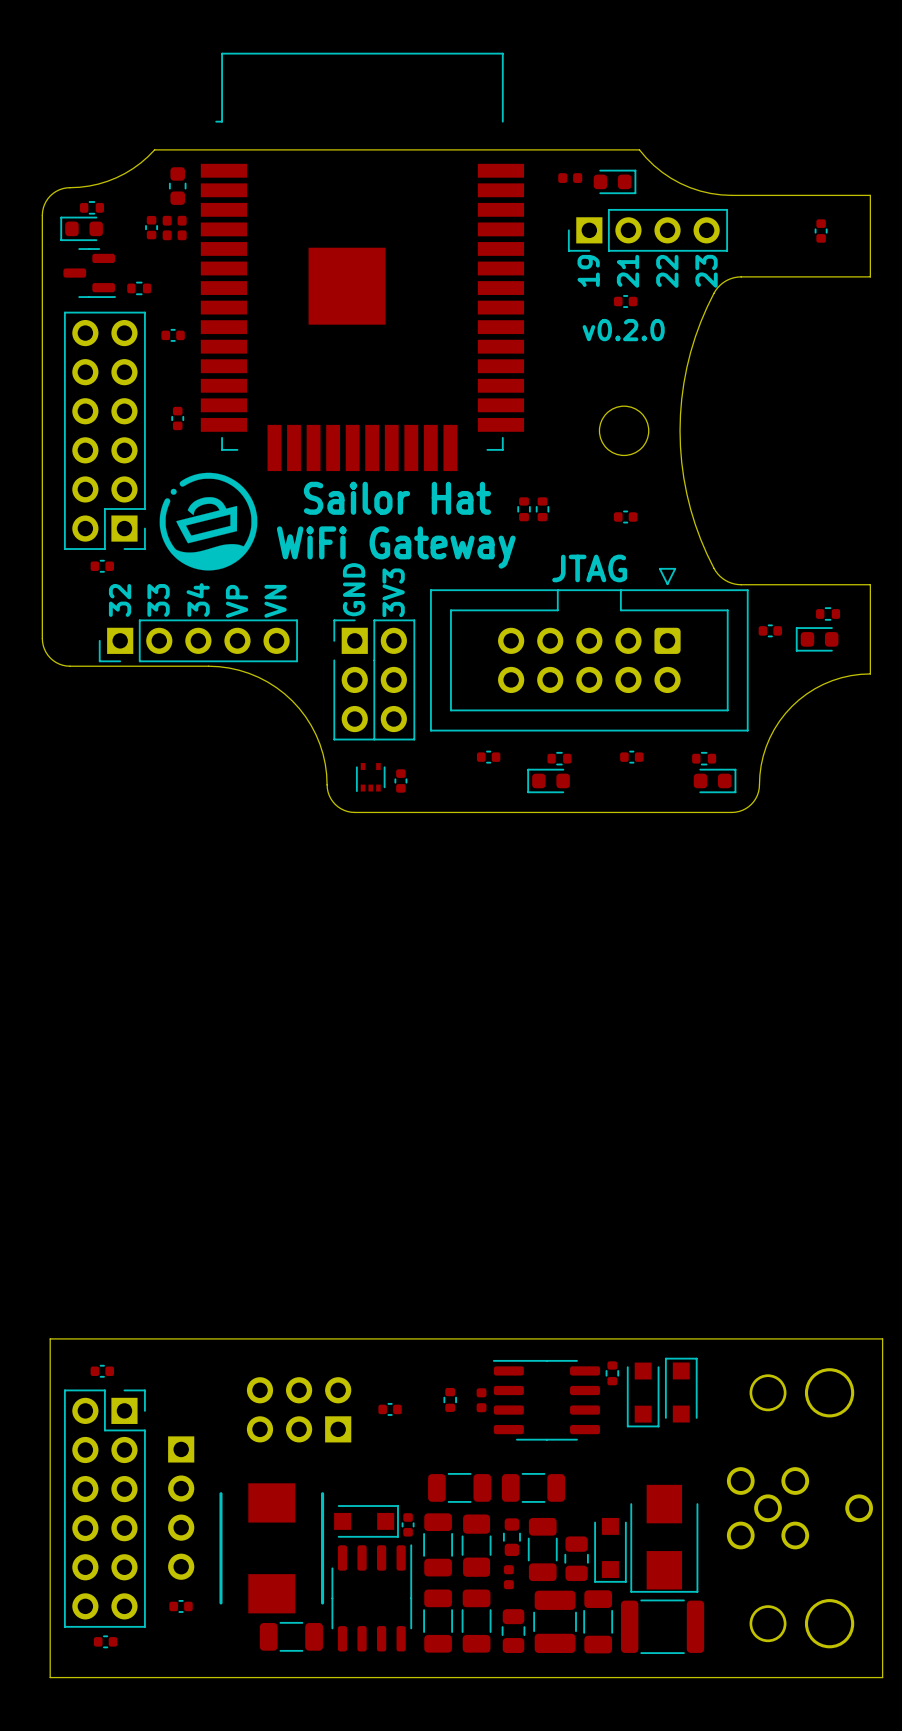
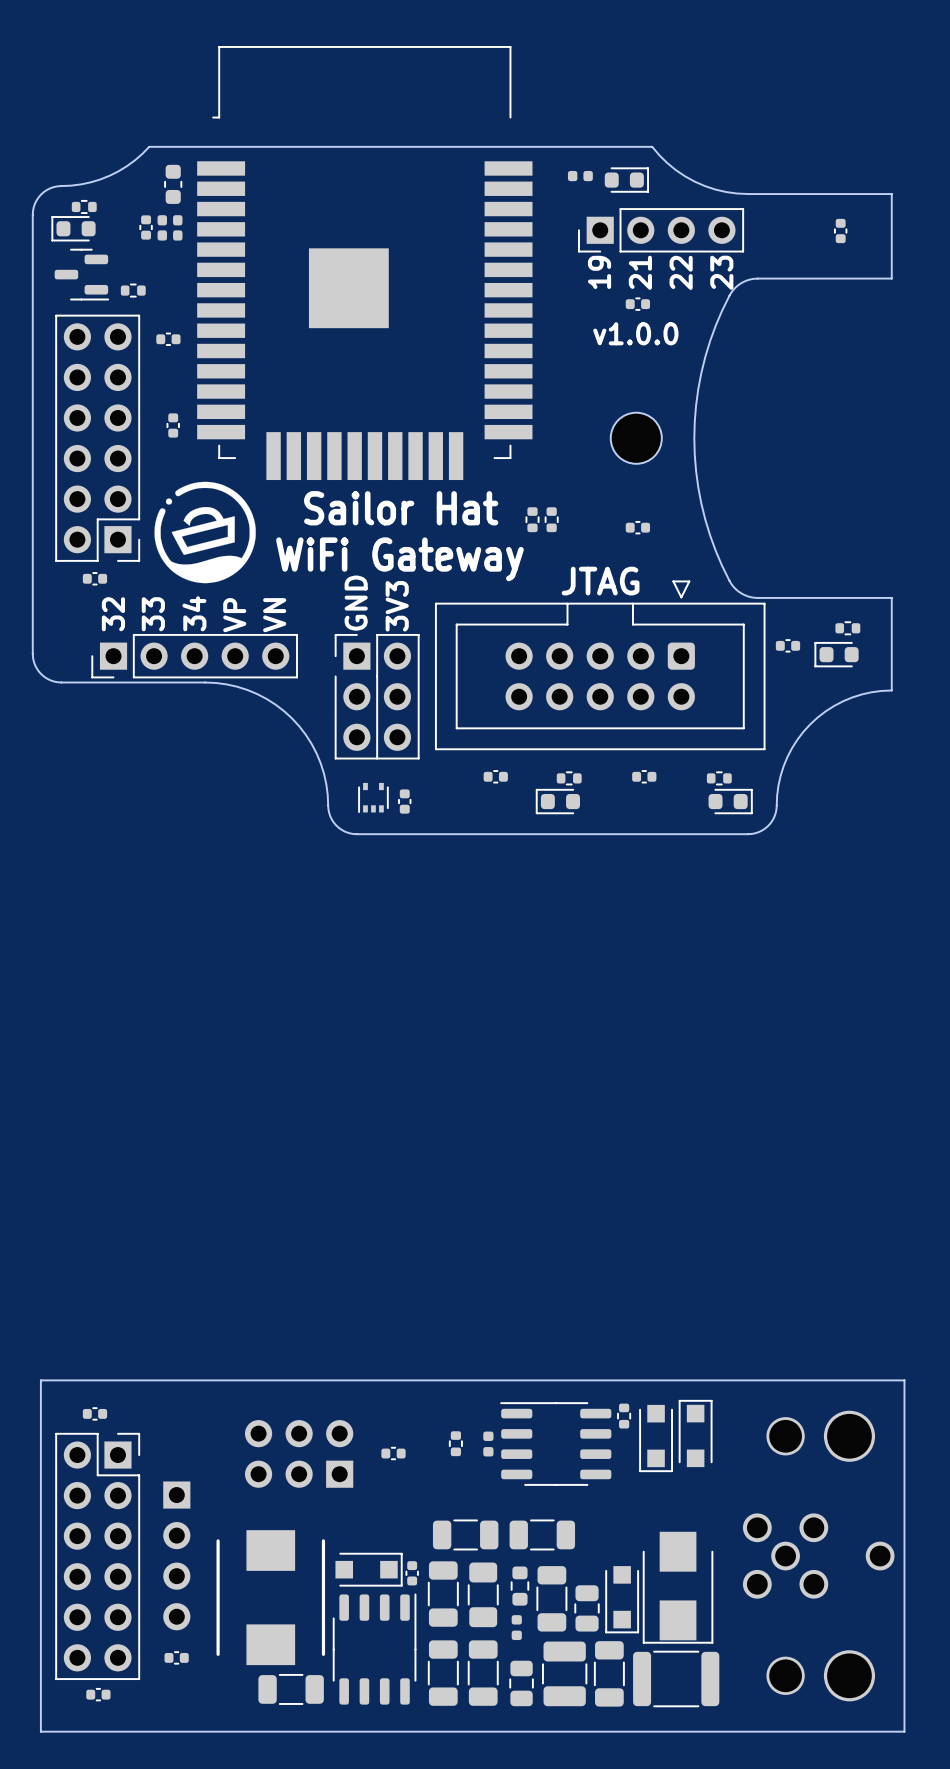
text: v0.2.0 (623, 330) -> v1.0.0 (635, 333)

